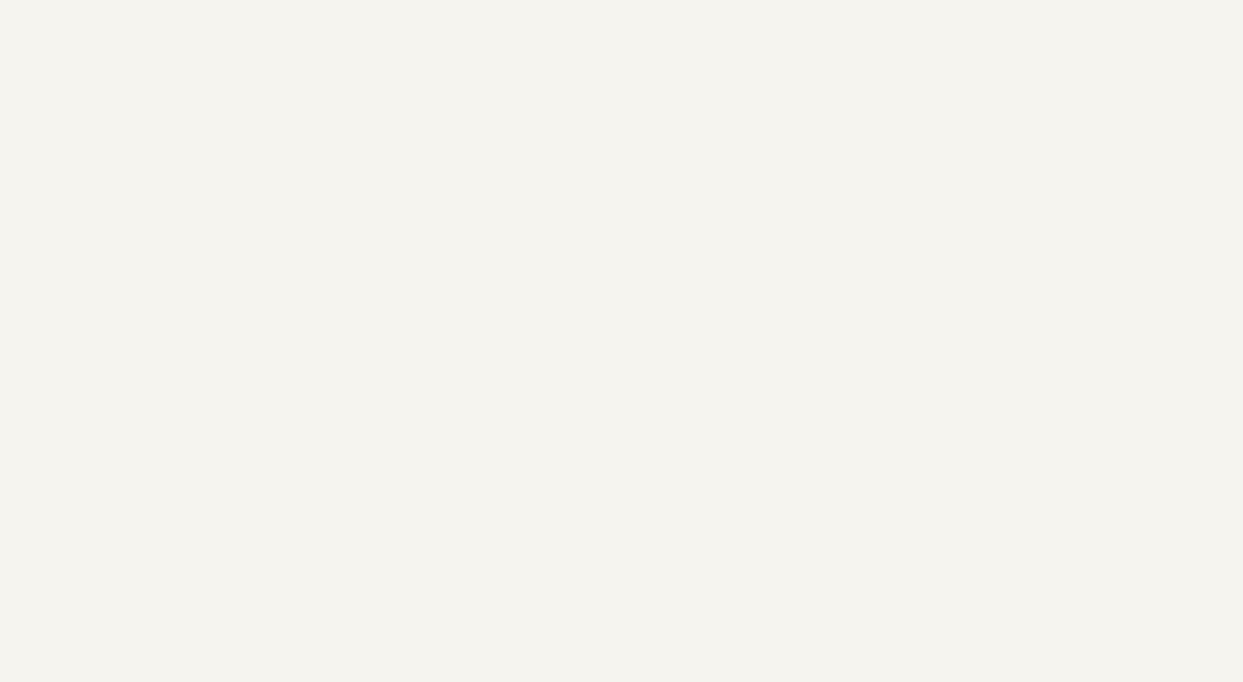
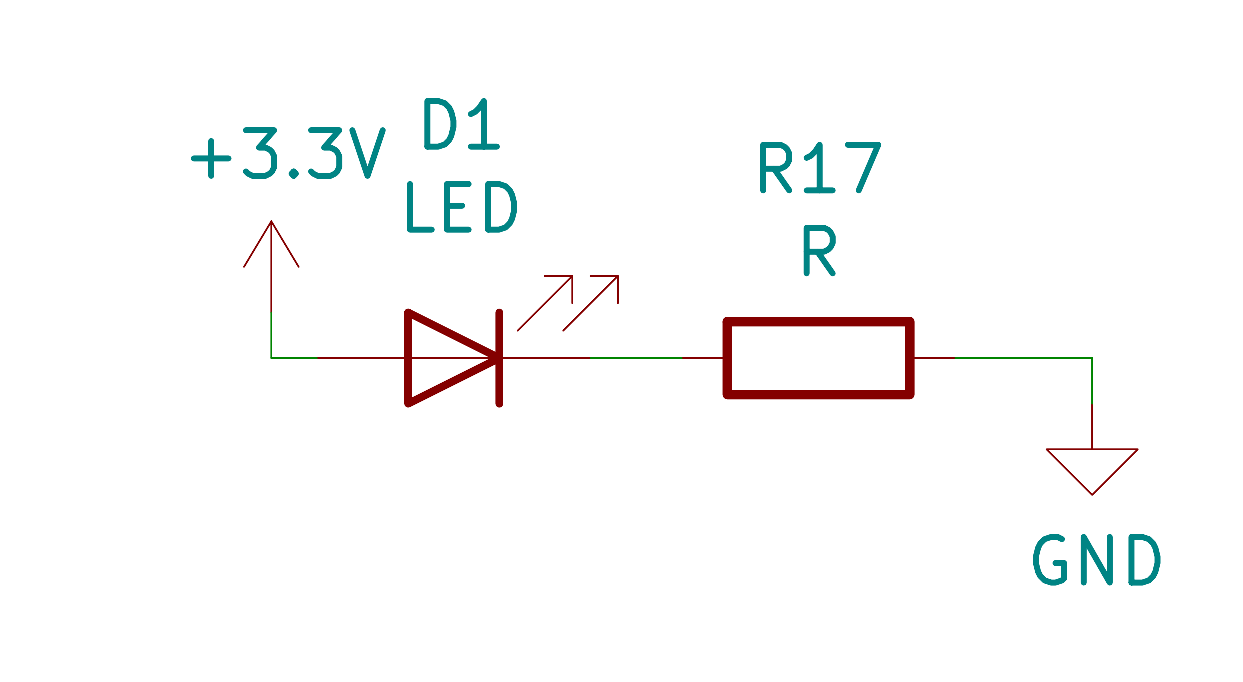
power symbol: none -> +3.3V (271, 266)
wire: none -> (271, 312) (271, 358) (316, 358)
D1: none -> LED (467, 341)
wire: none -> (590, 358) (681, 358)
R17: none -> R (818, 358)
wire: none -> (955, 358) (1092, 358) (1092, 403)
power symbol: none -> GND (1092, 449)

